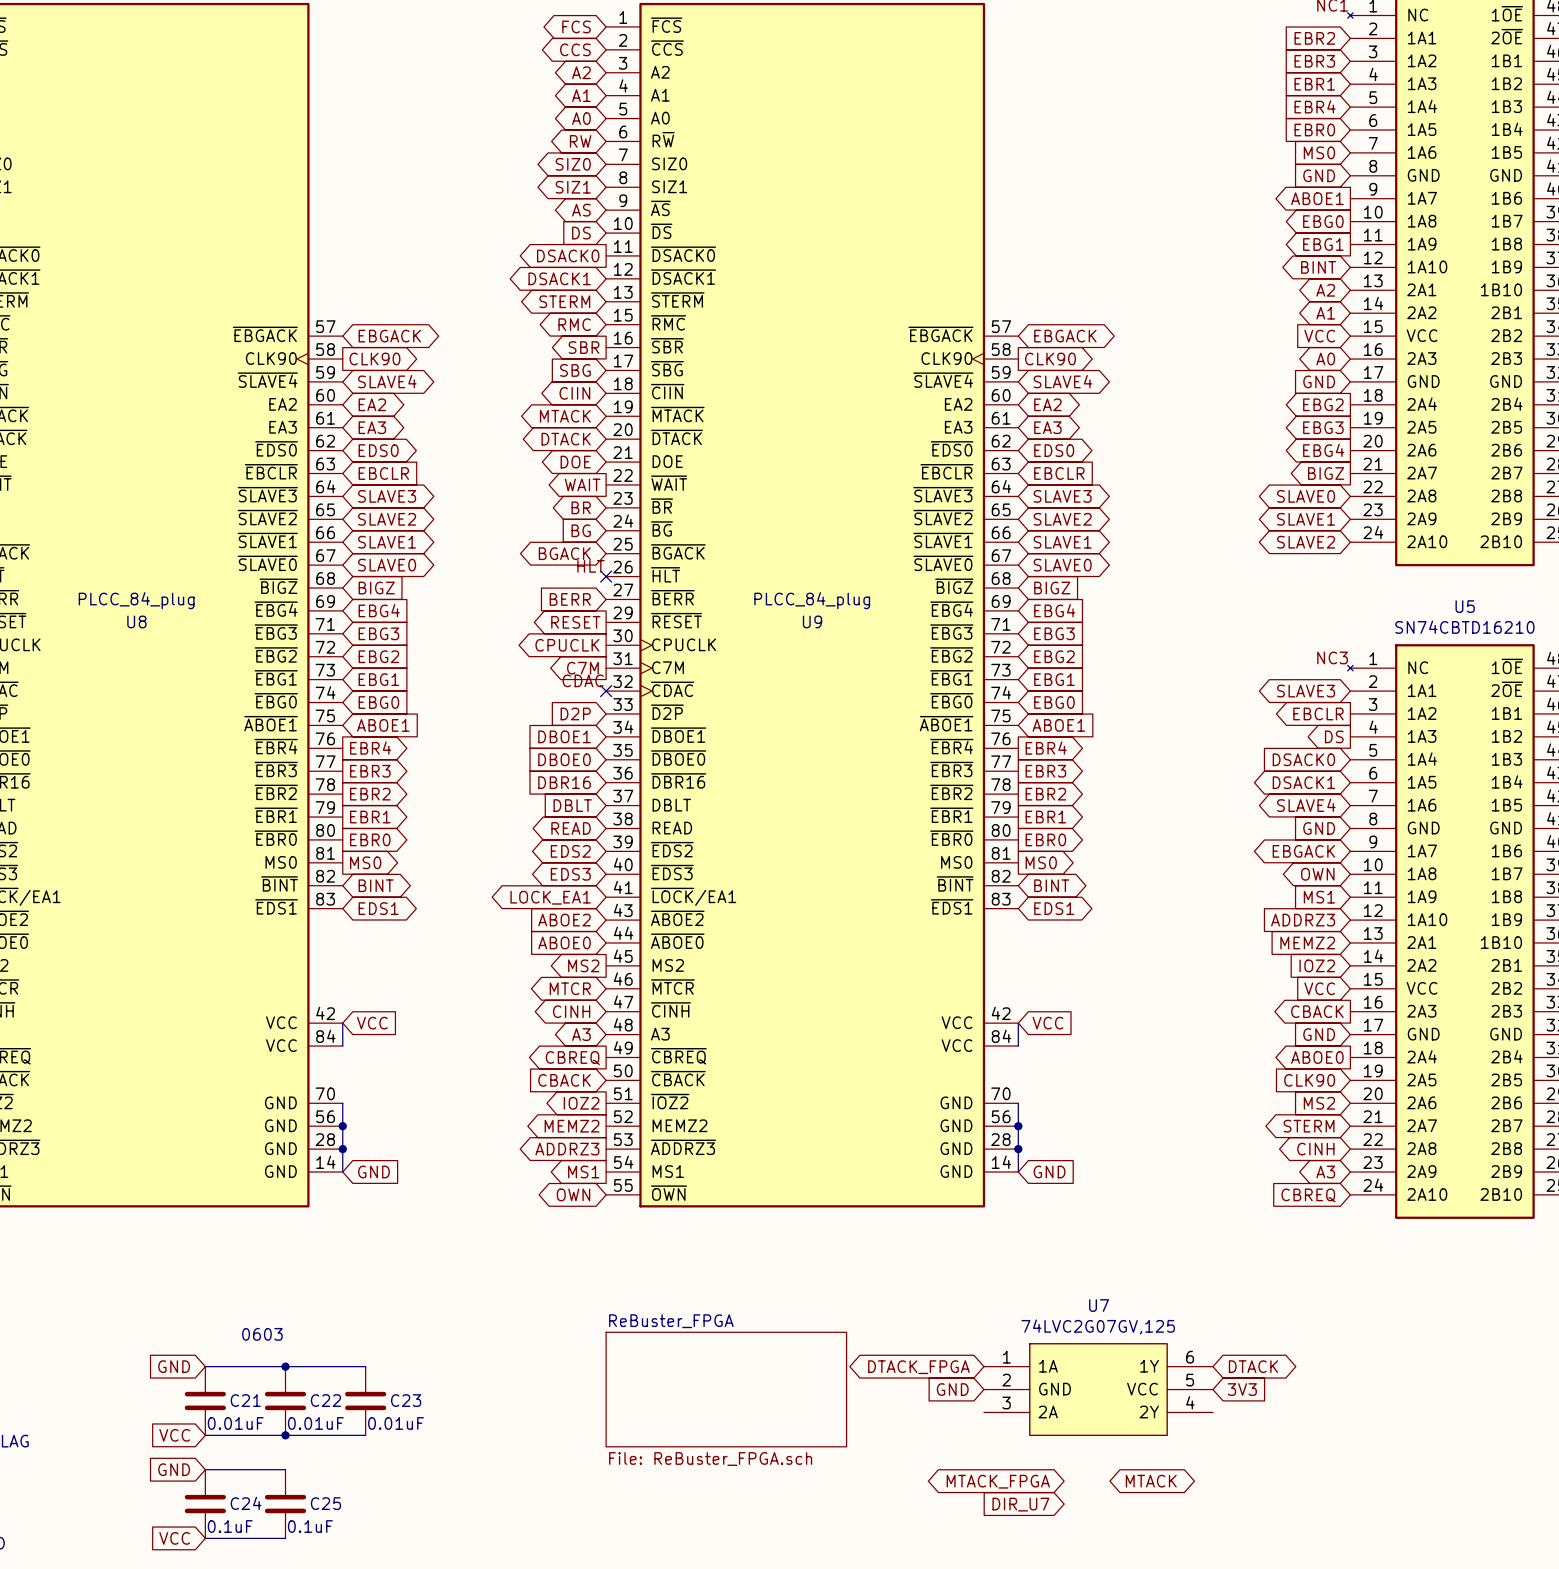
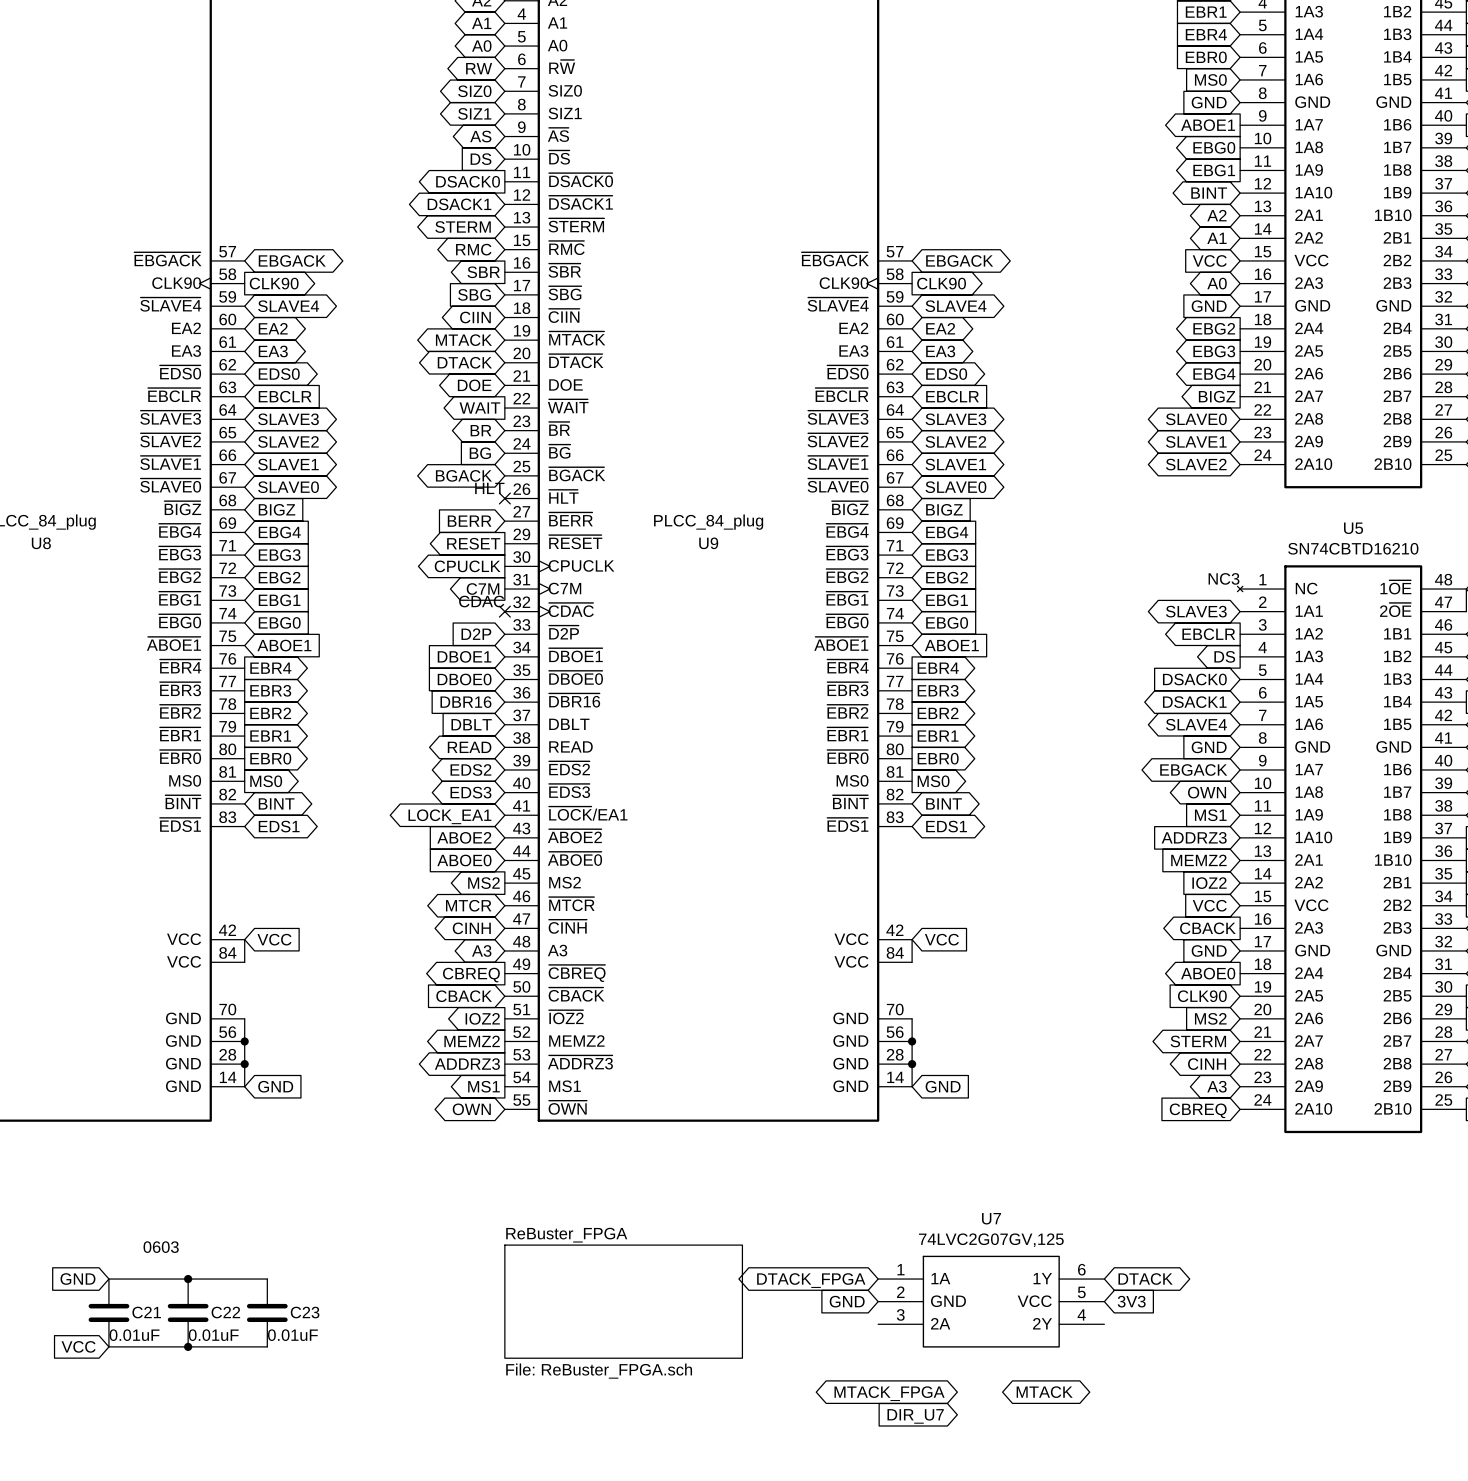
global label: GND (174, 1469) -> none
wire: (205, 1469) (285, 1469) -> none
C24: 0.1uF (205, 1504) -> none
C25: 0.1uF (285, 1504) -> none
global label: VCC (174, 1538) -> none
wire: (205, 1538) (285, 1538) -> none

